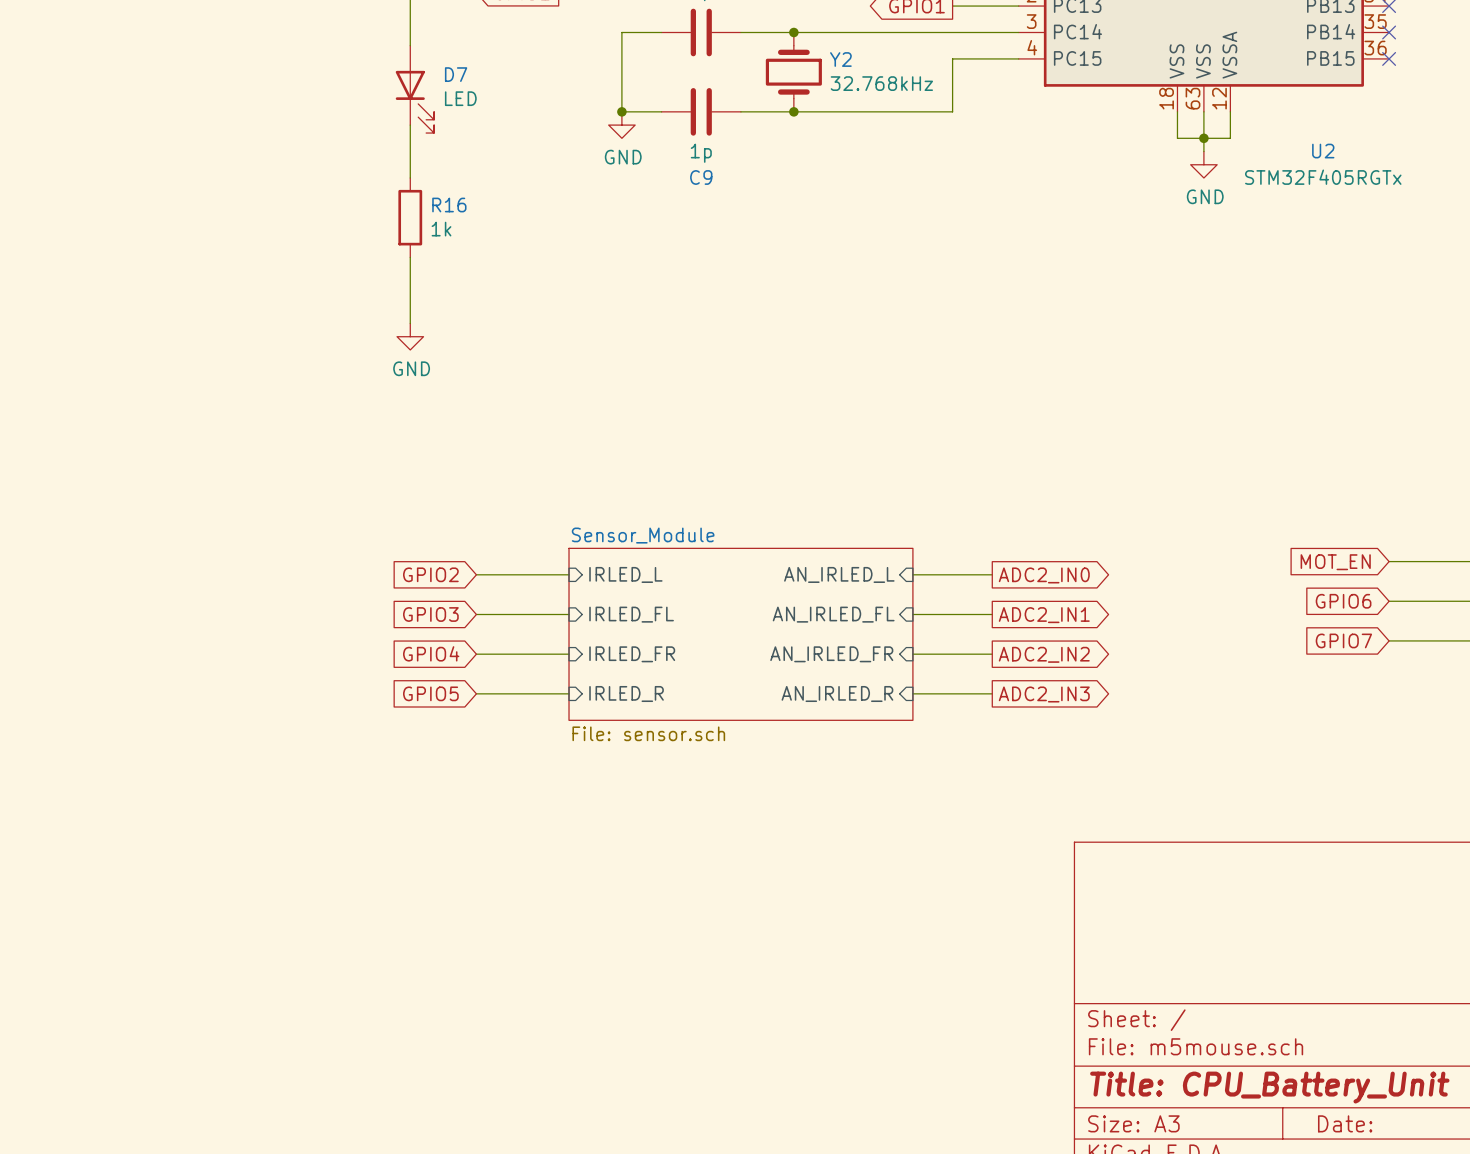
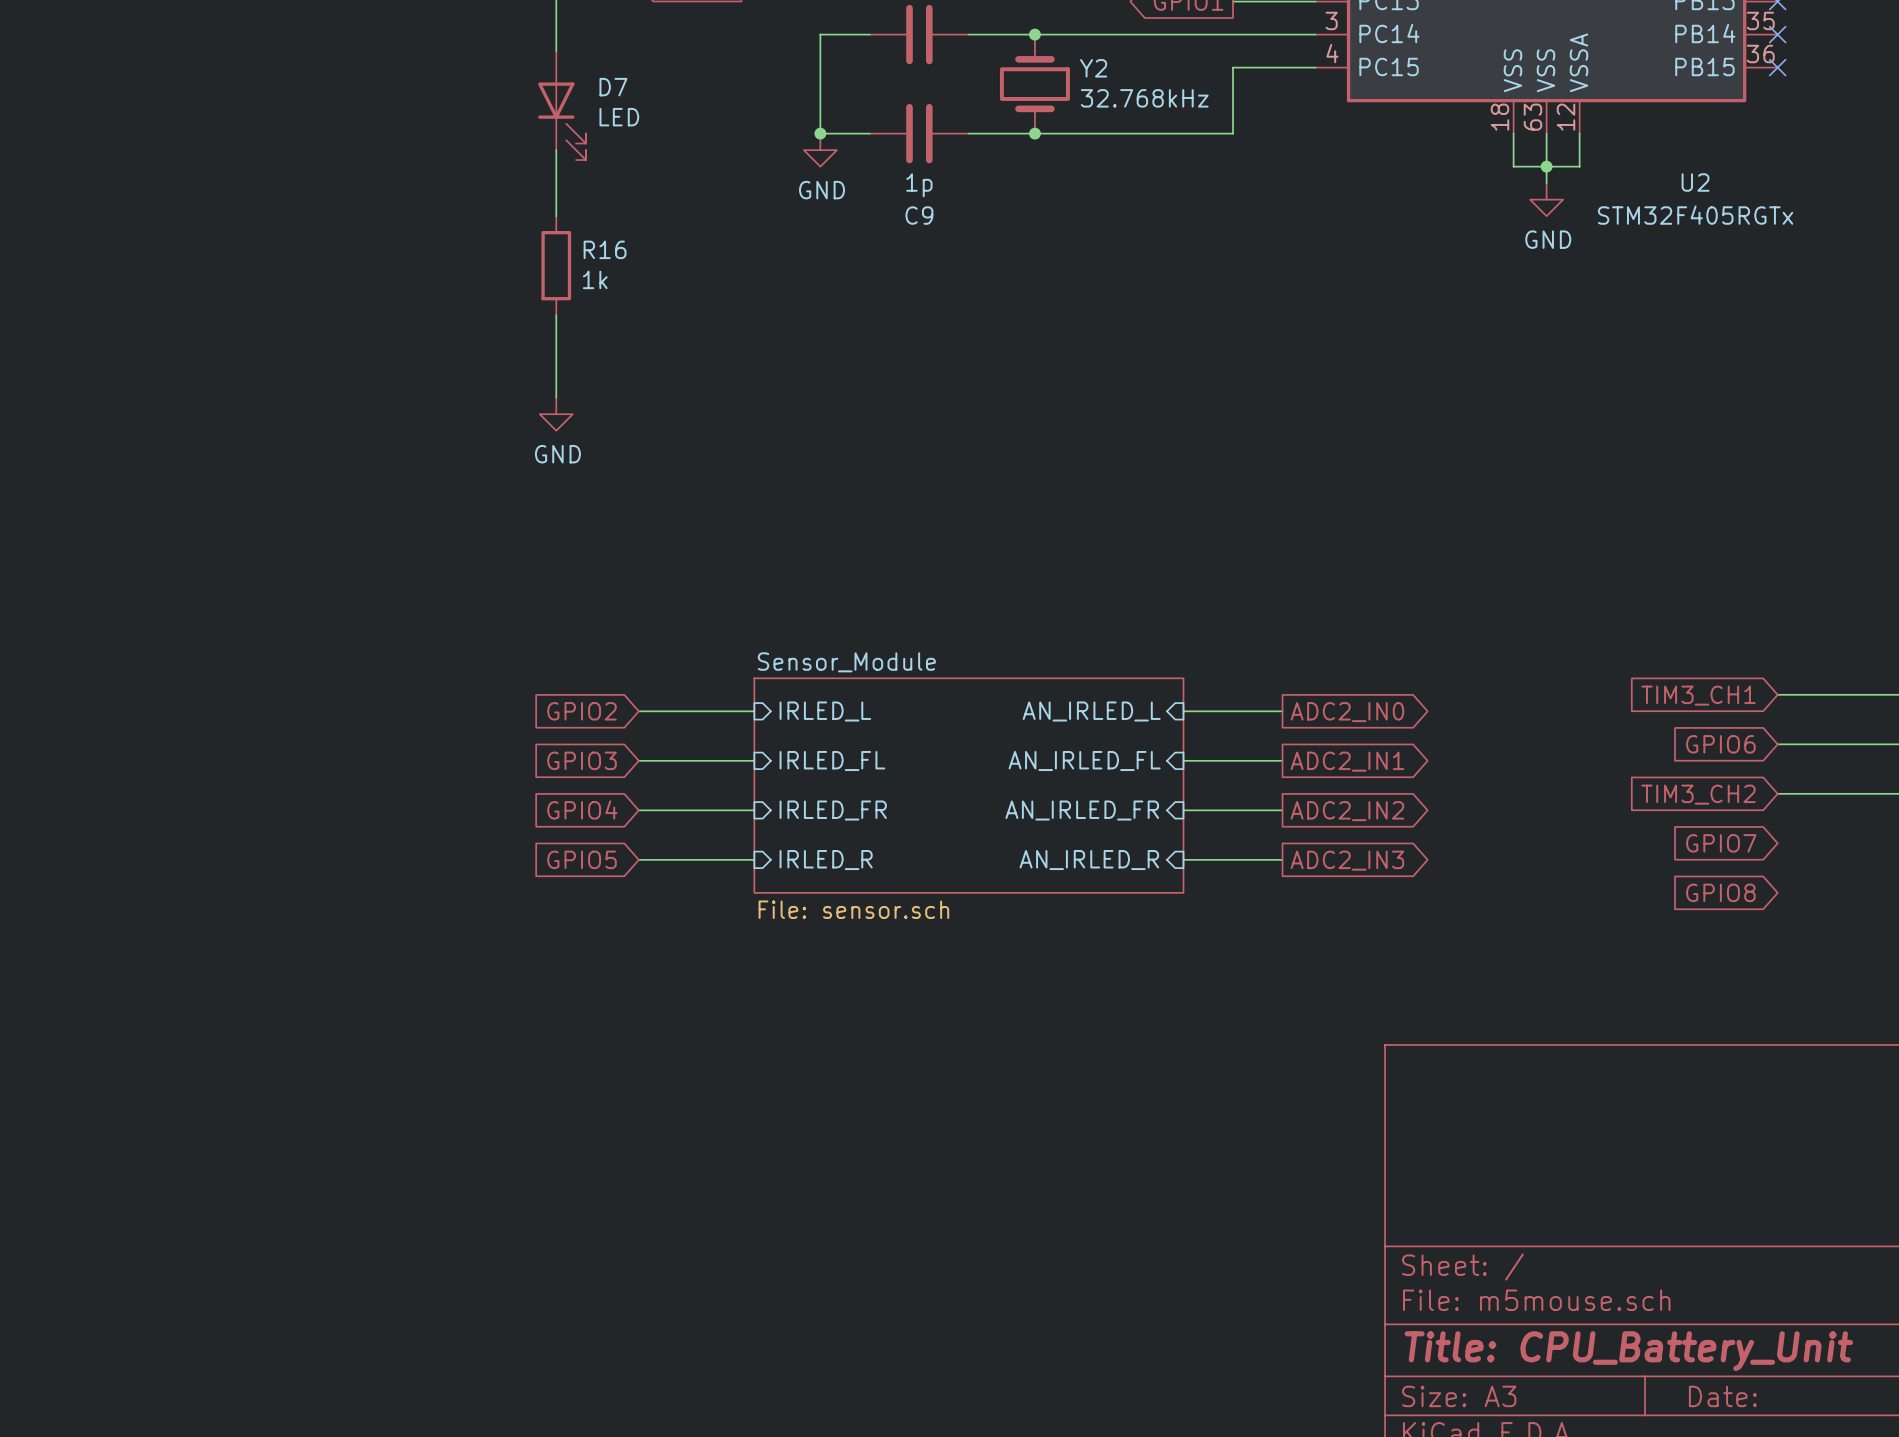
global label: MOT_EN (1335, 562) -> TIM3_CH1 (1698, 695)
global label: GPIO7 (1343, 640) -> TIM3_CH2 (1698, 794)
global label: none -> GPIO7 (1721, 843)
global label: none -> GPIO8 (1720, 892)

